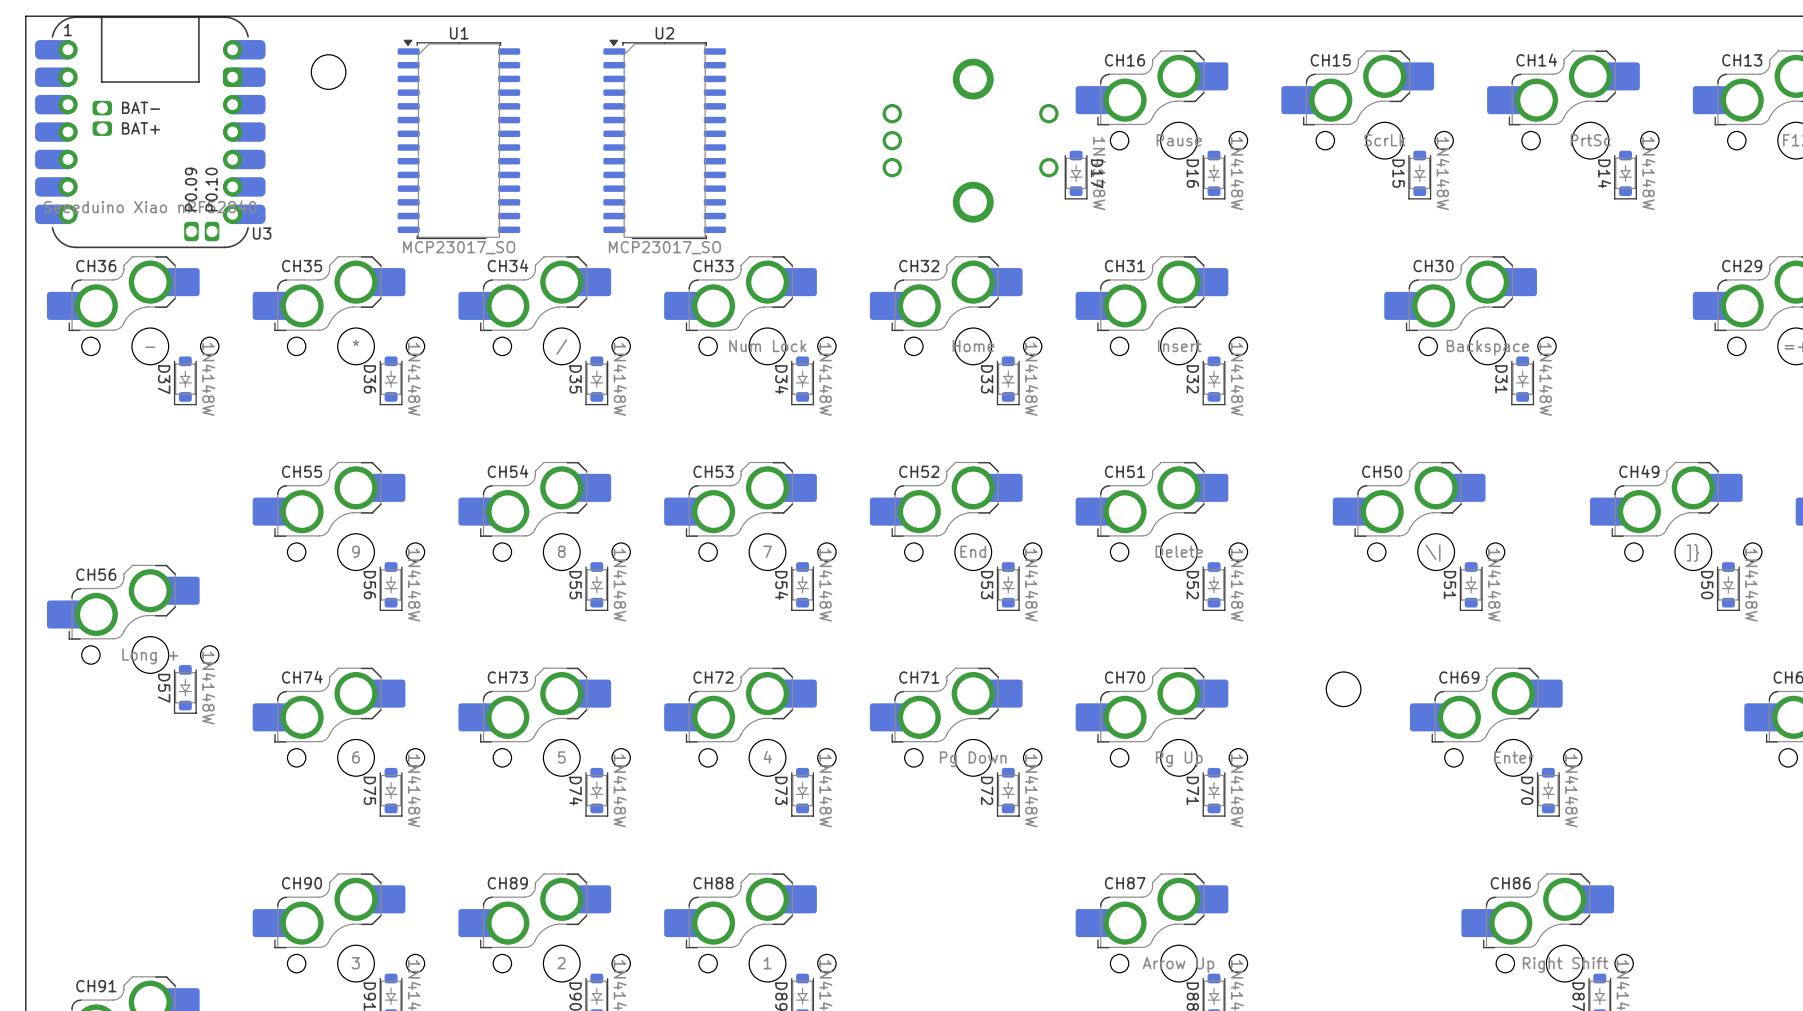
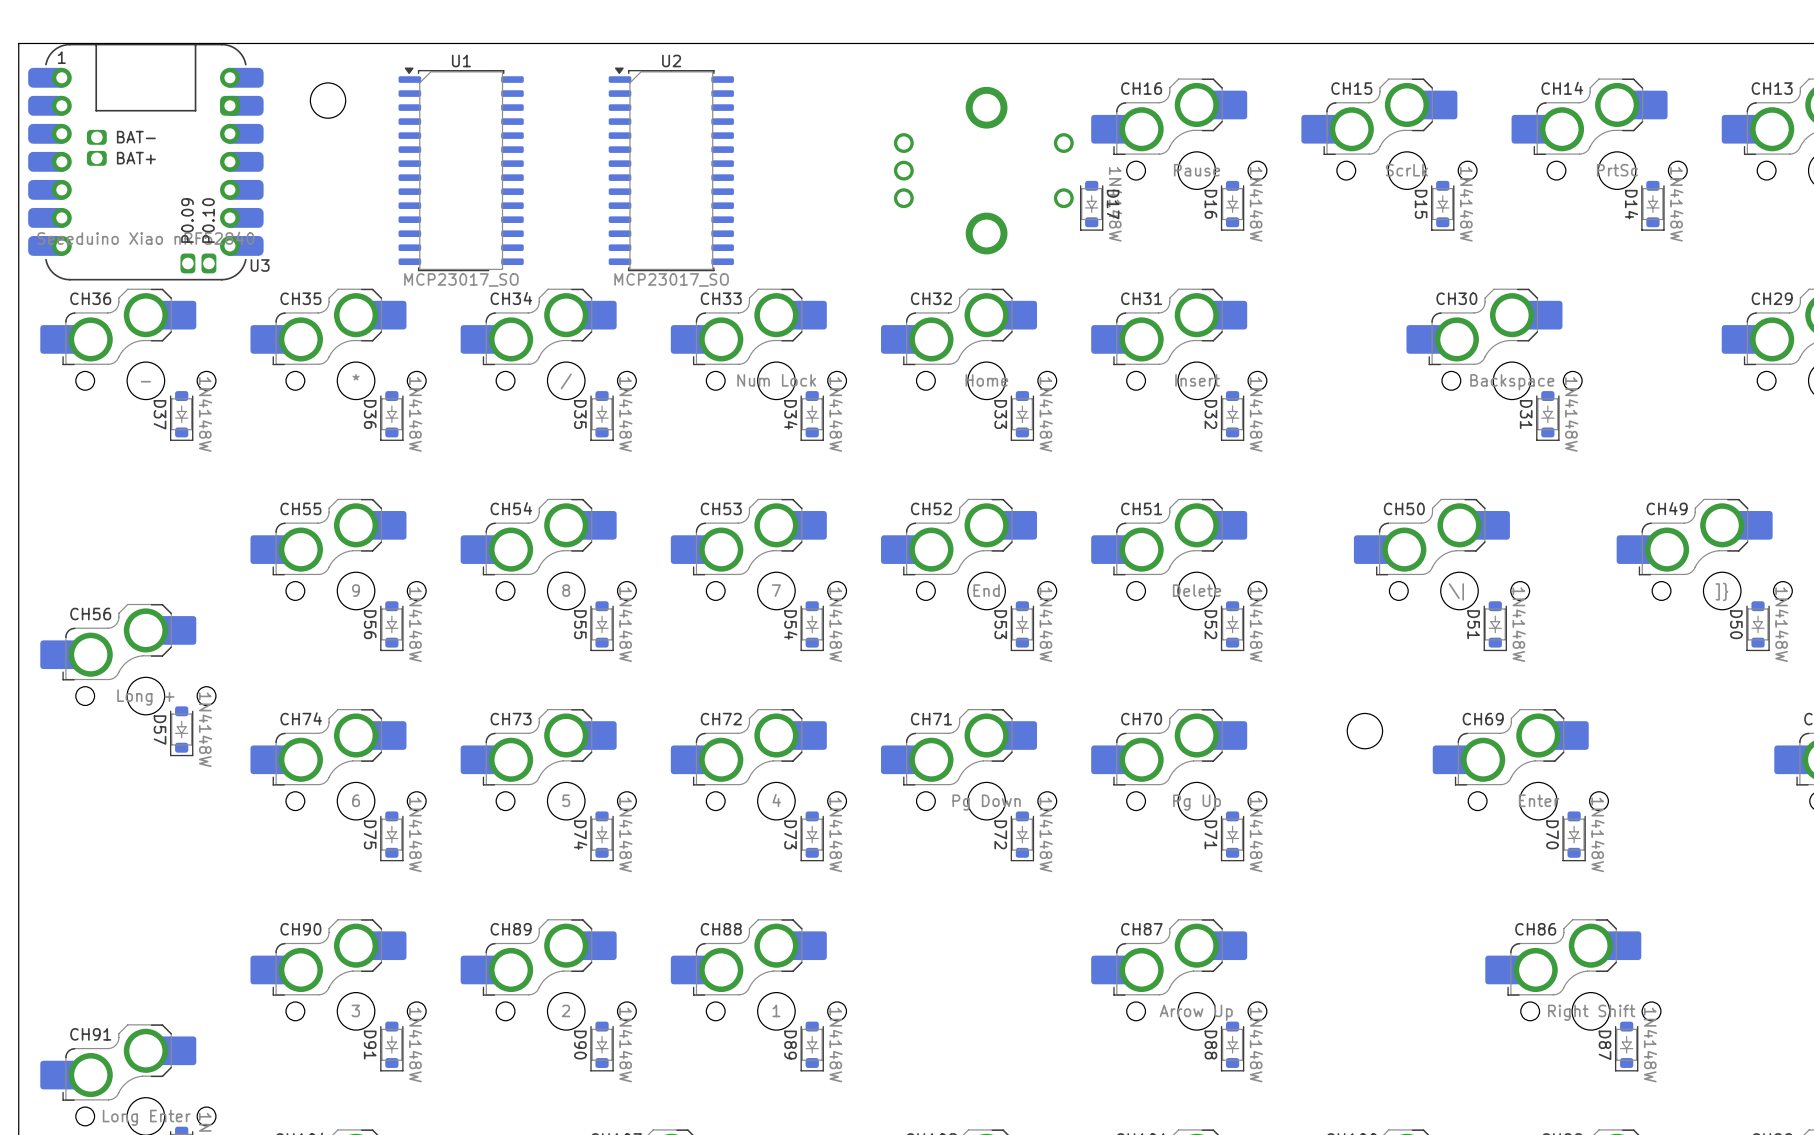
U2 footprint: [603, 39, 726, 240] -> [608, 67, 734, 272]

